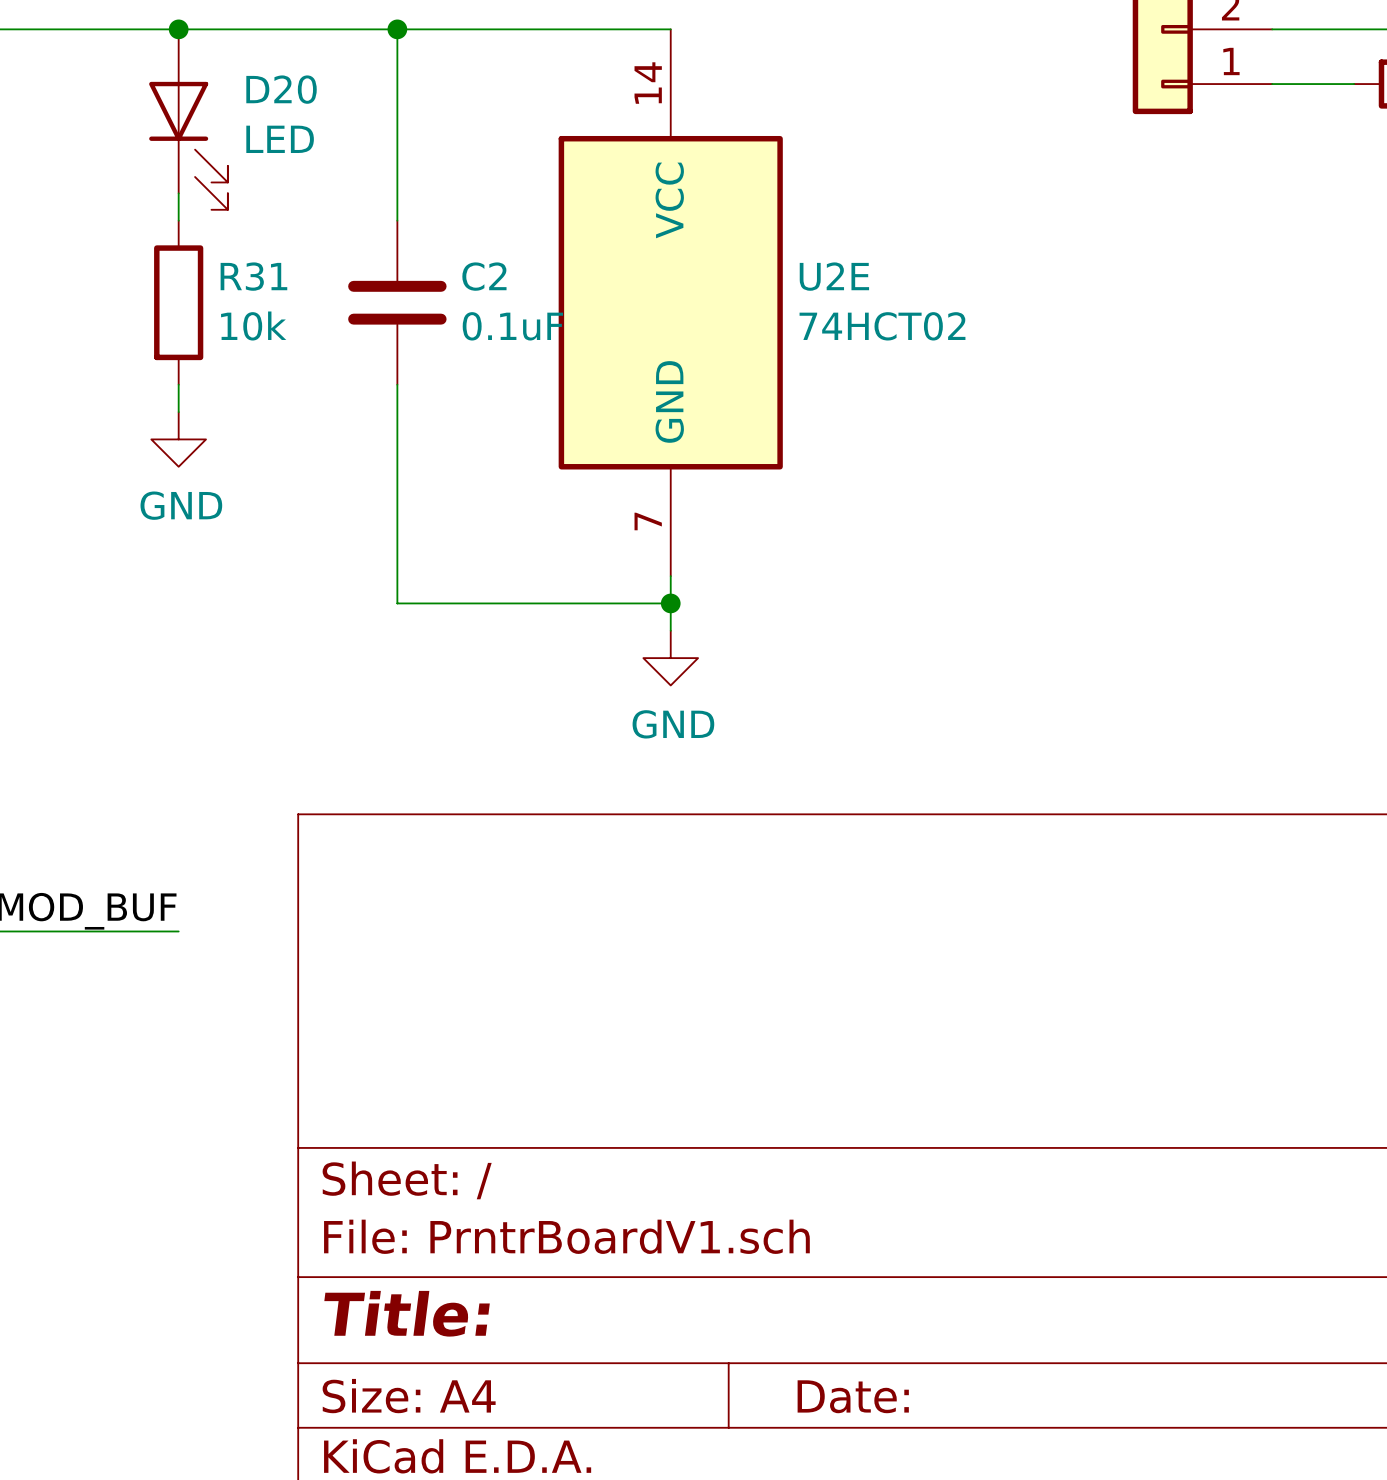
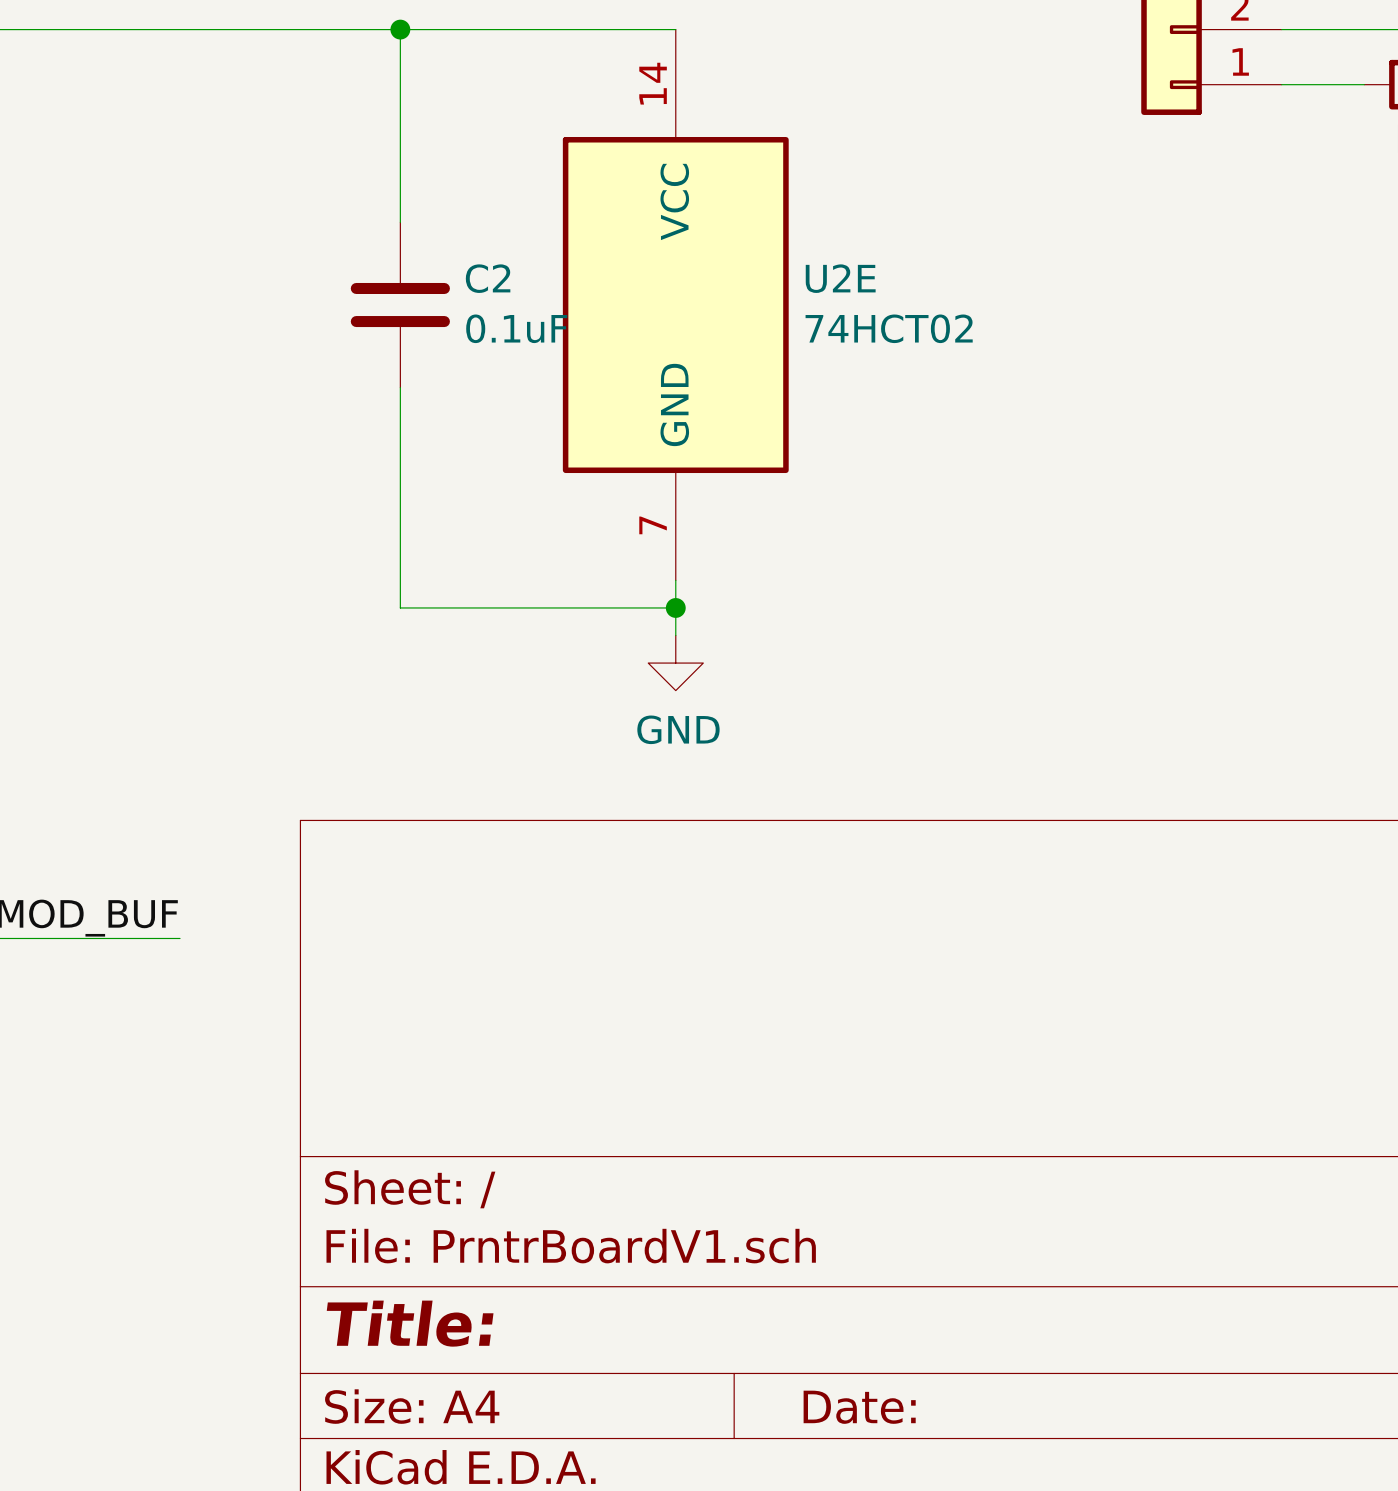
junction: (178, 29) -> none
D20: LED (188, 119) -> none
wire: (178, 193) (178, 220) -> none
R31: 10k (178, 302) -> none
wire: (178, 384) (178, 412) -> none
power symbol: GND (178, 439) -> none

